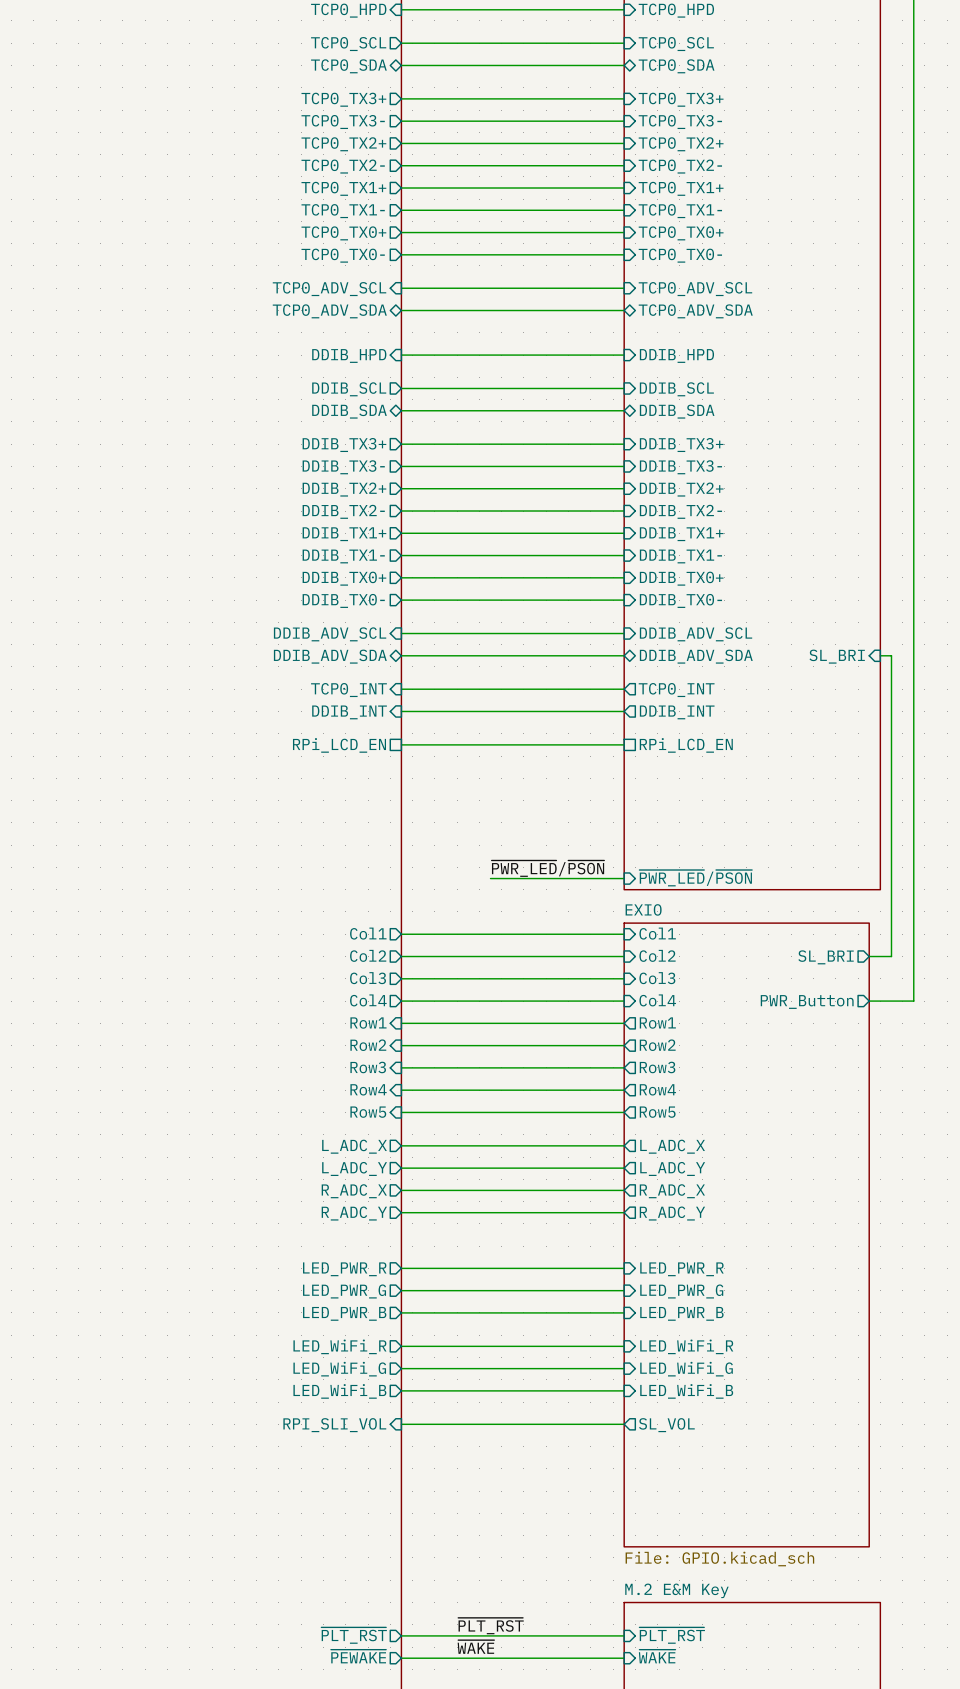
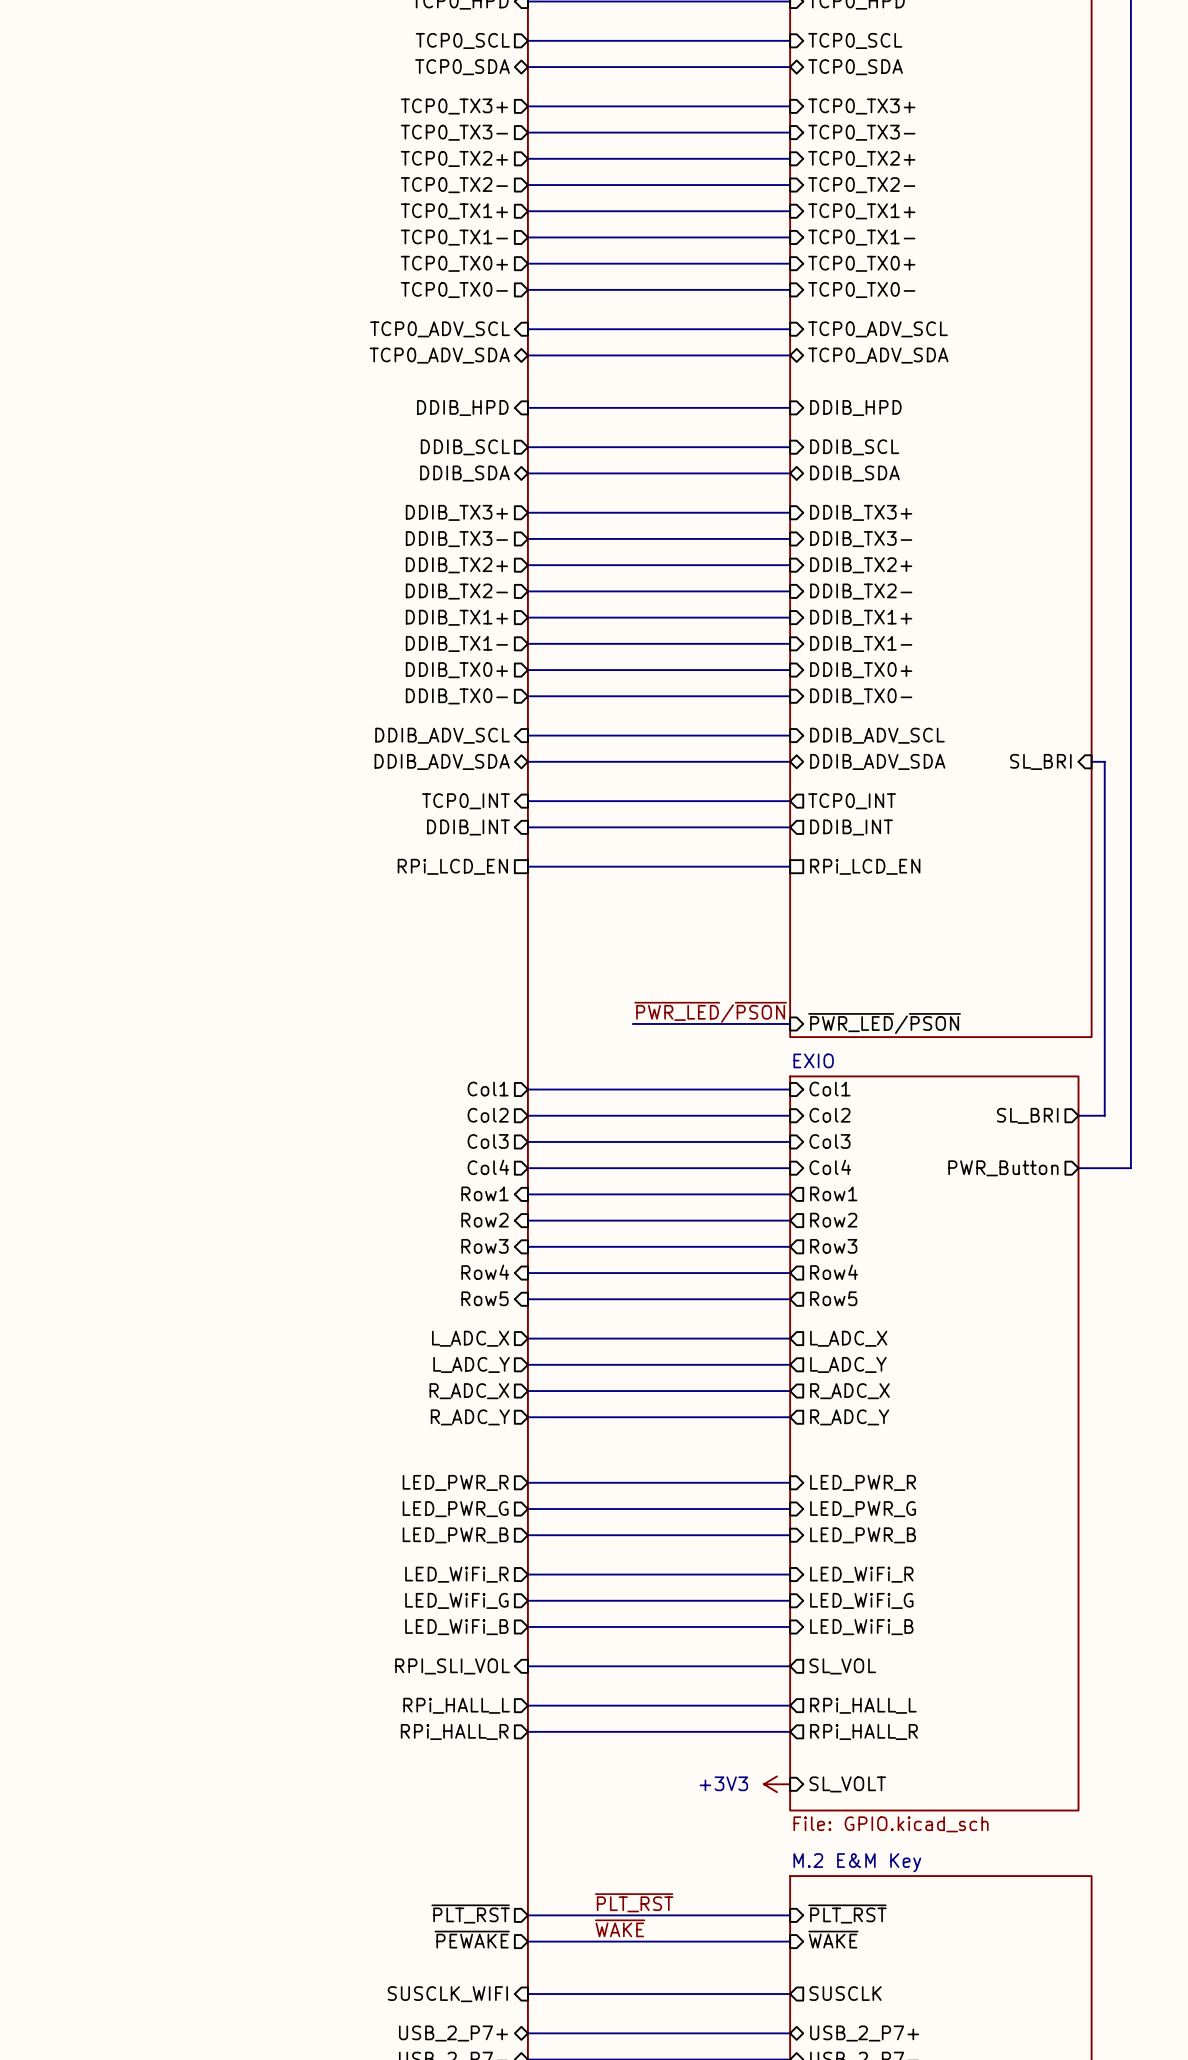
wire: none -> (527, 1705) (790, 1705)
sheet pin: none -> RPi_HALL_L (456, 1705)
sheet pin: none -> RPi_HALL_L (863, 1705)
sheet pin: none -> RPi_HALL_R (454, 1731)
wire: none -> (527, 1731) (790, 1731)
sheet pin: none -> RPi_HALL_R (863, 1731)
power symbol: none -> +3V3 (777, 1784)
sheet pin: none -> SL_VOLT (847, 1784)

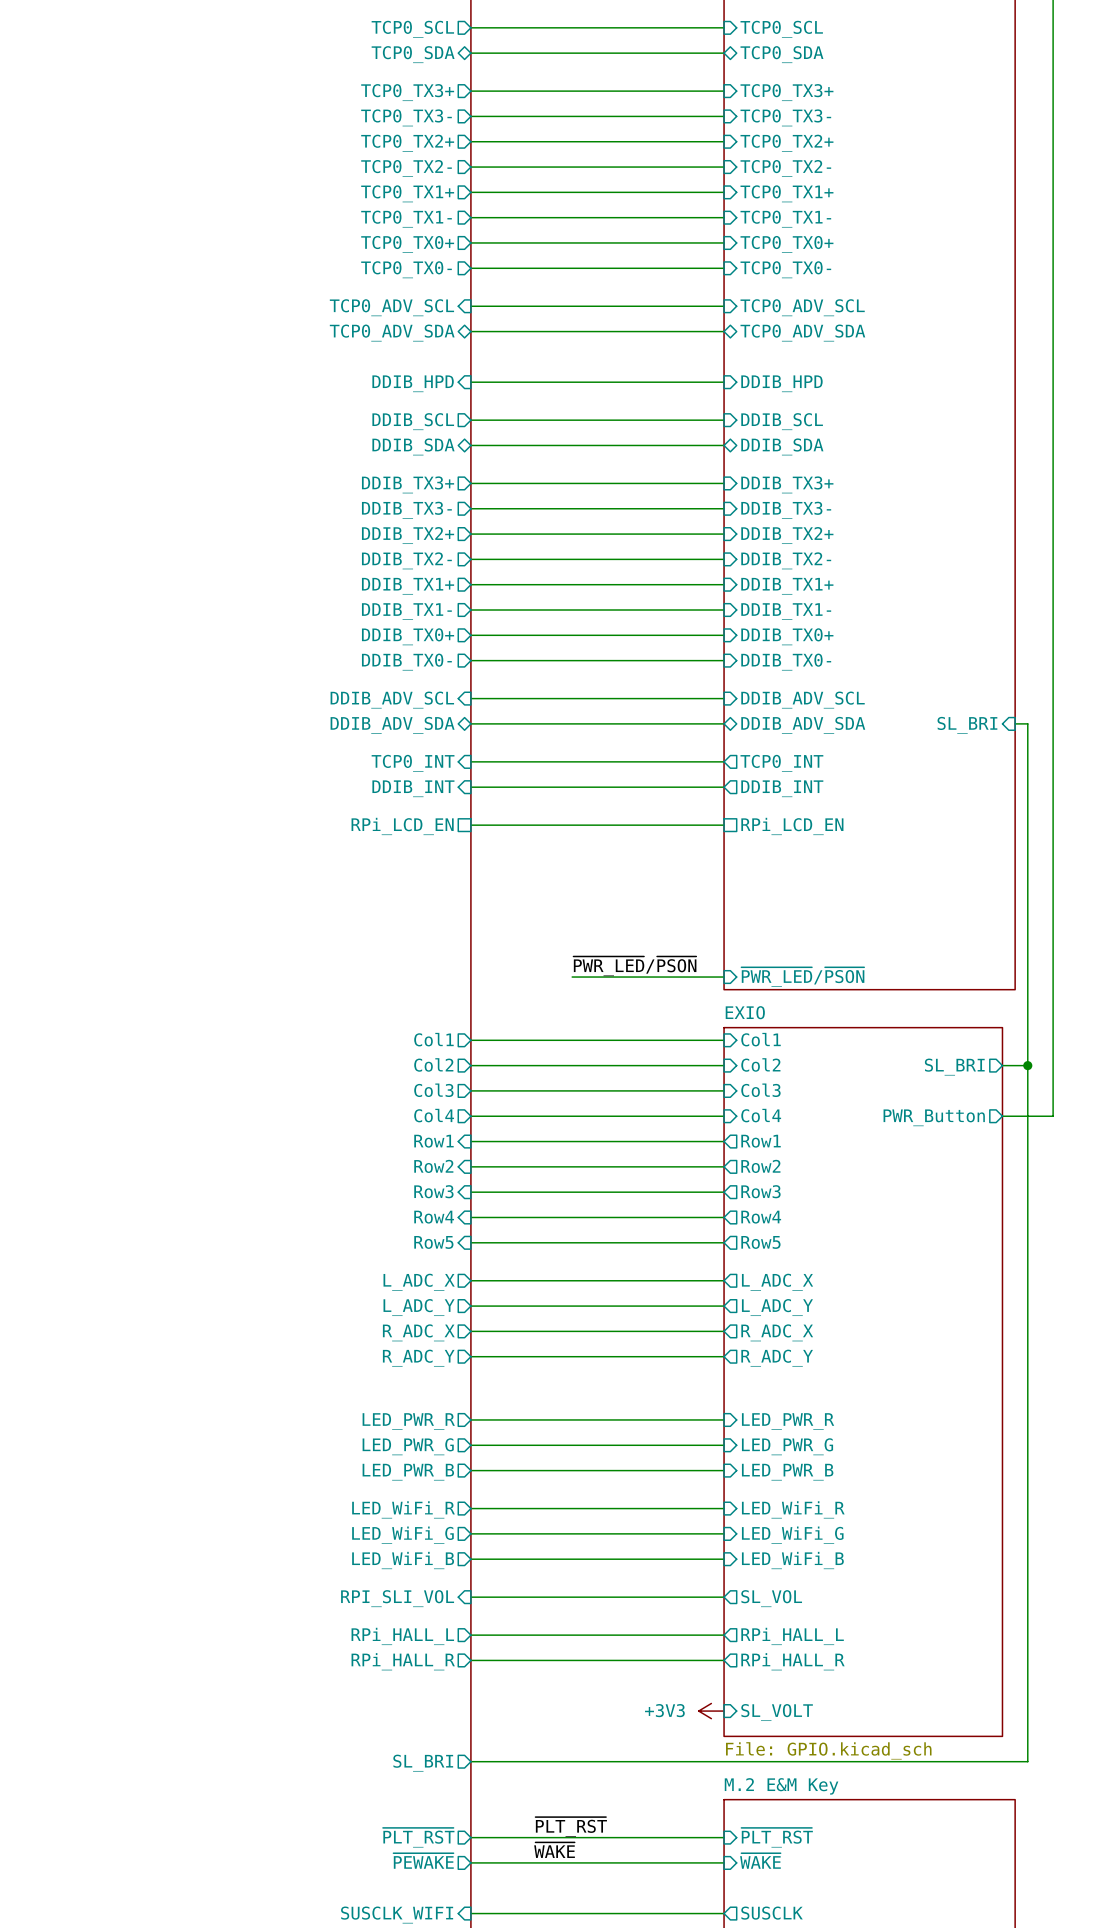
wire: none -> (1027, 1065) (1027, 1761) (470, 1761)
junction: none -> (1027, 1065)
sheet pin: none -> SL_BRI (423, 1763)

